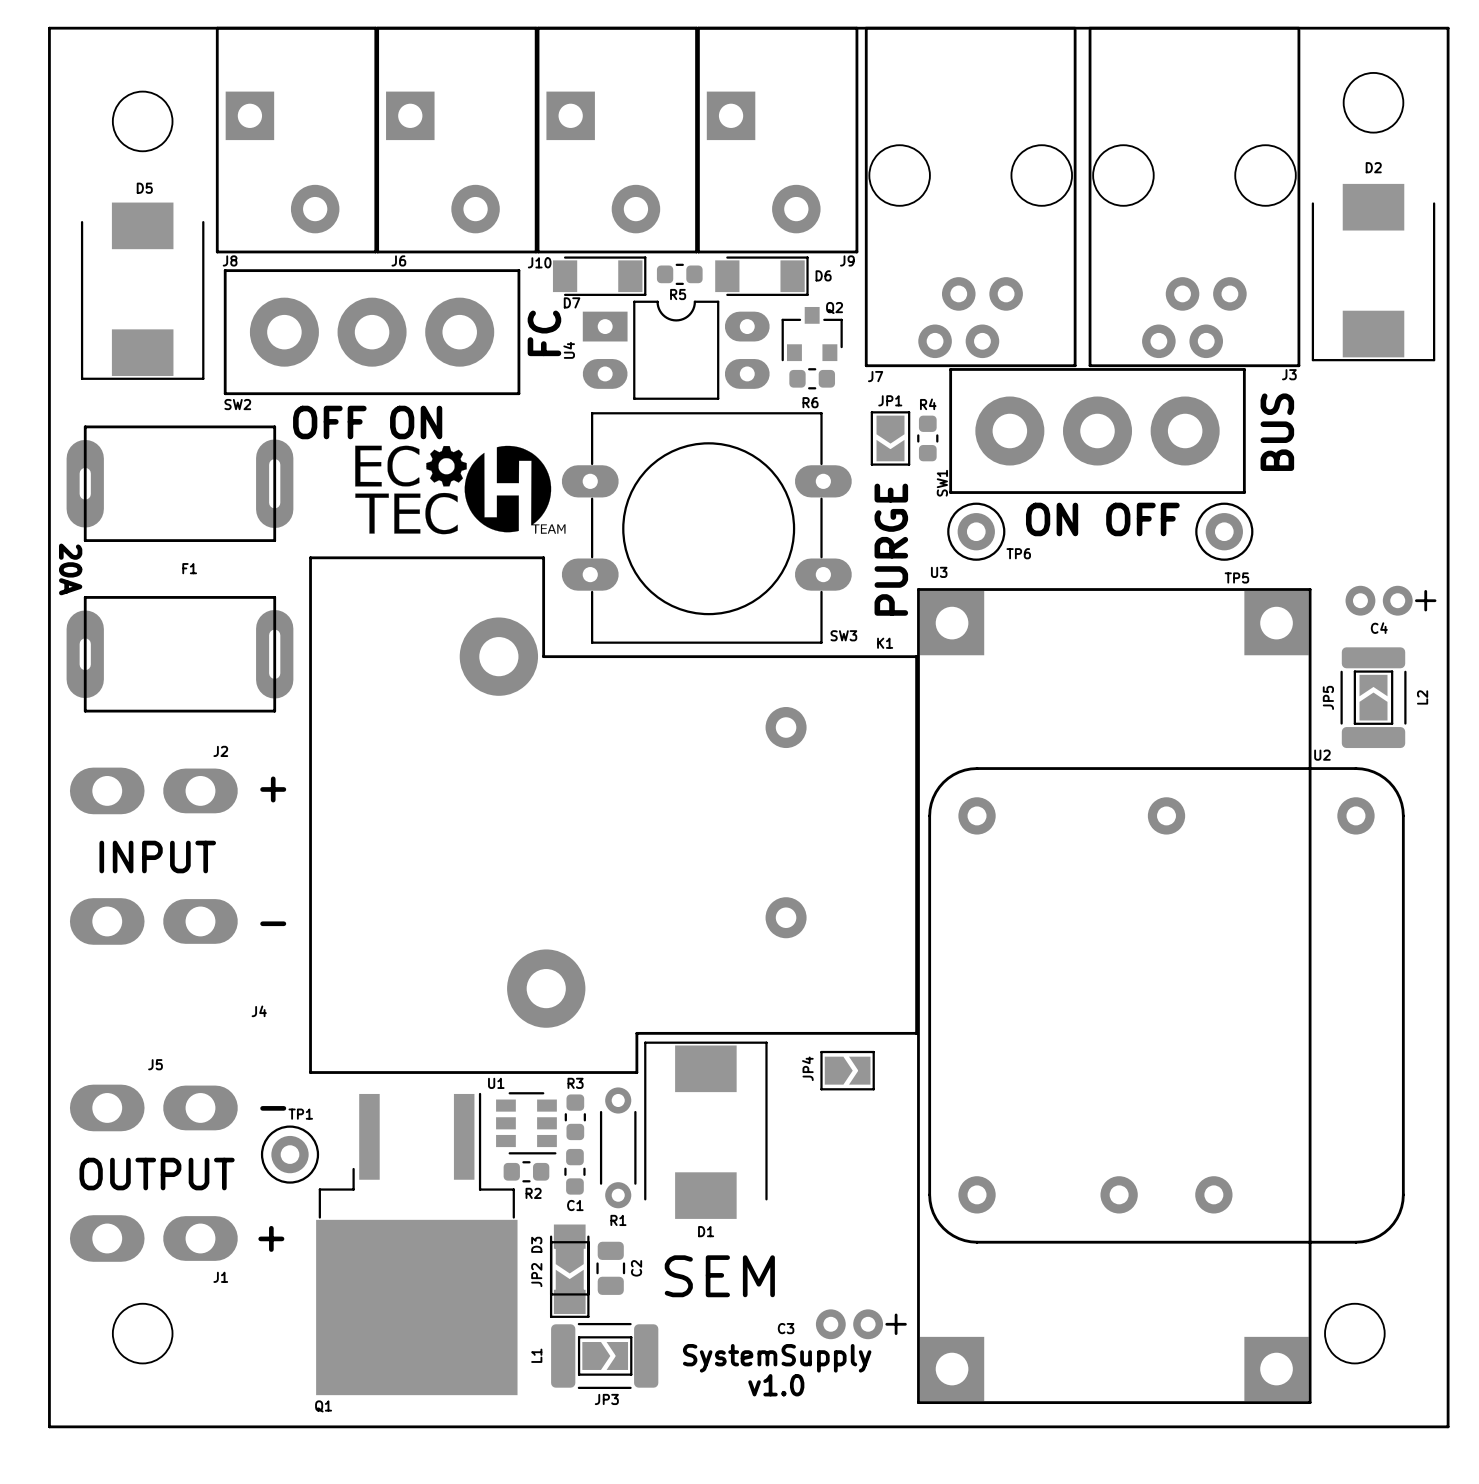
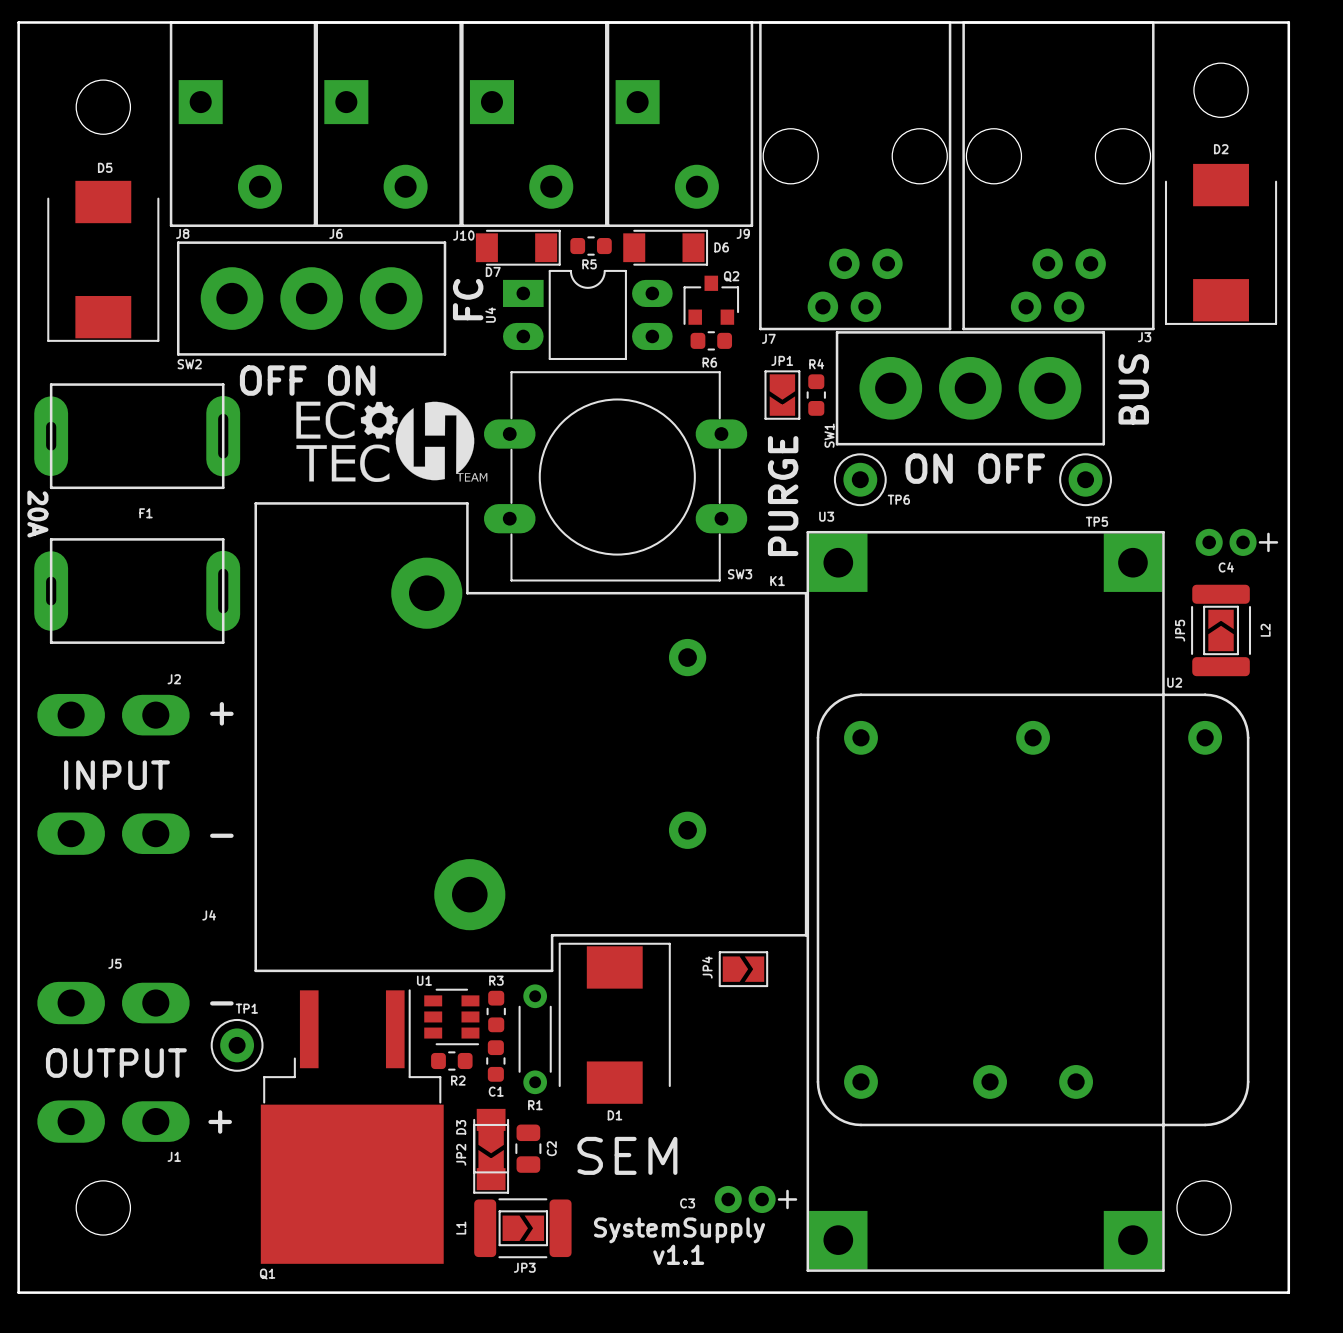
text: v1.0 (776, 1385) -> v1.1 (678, 1254)

